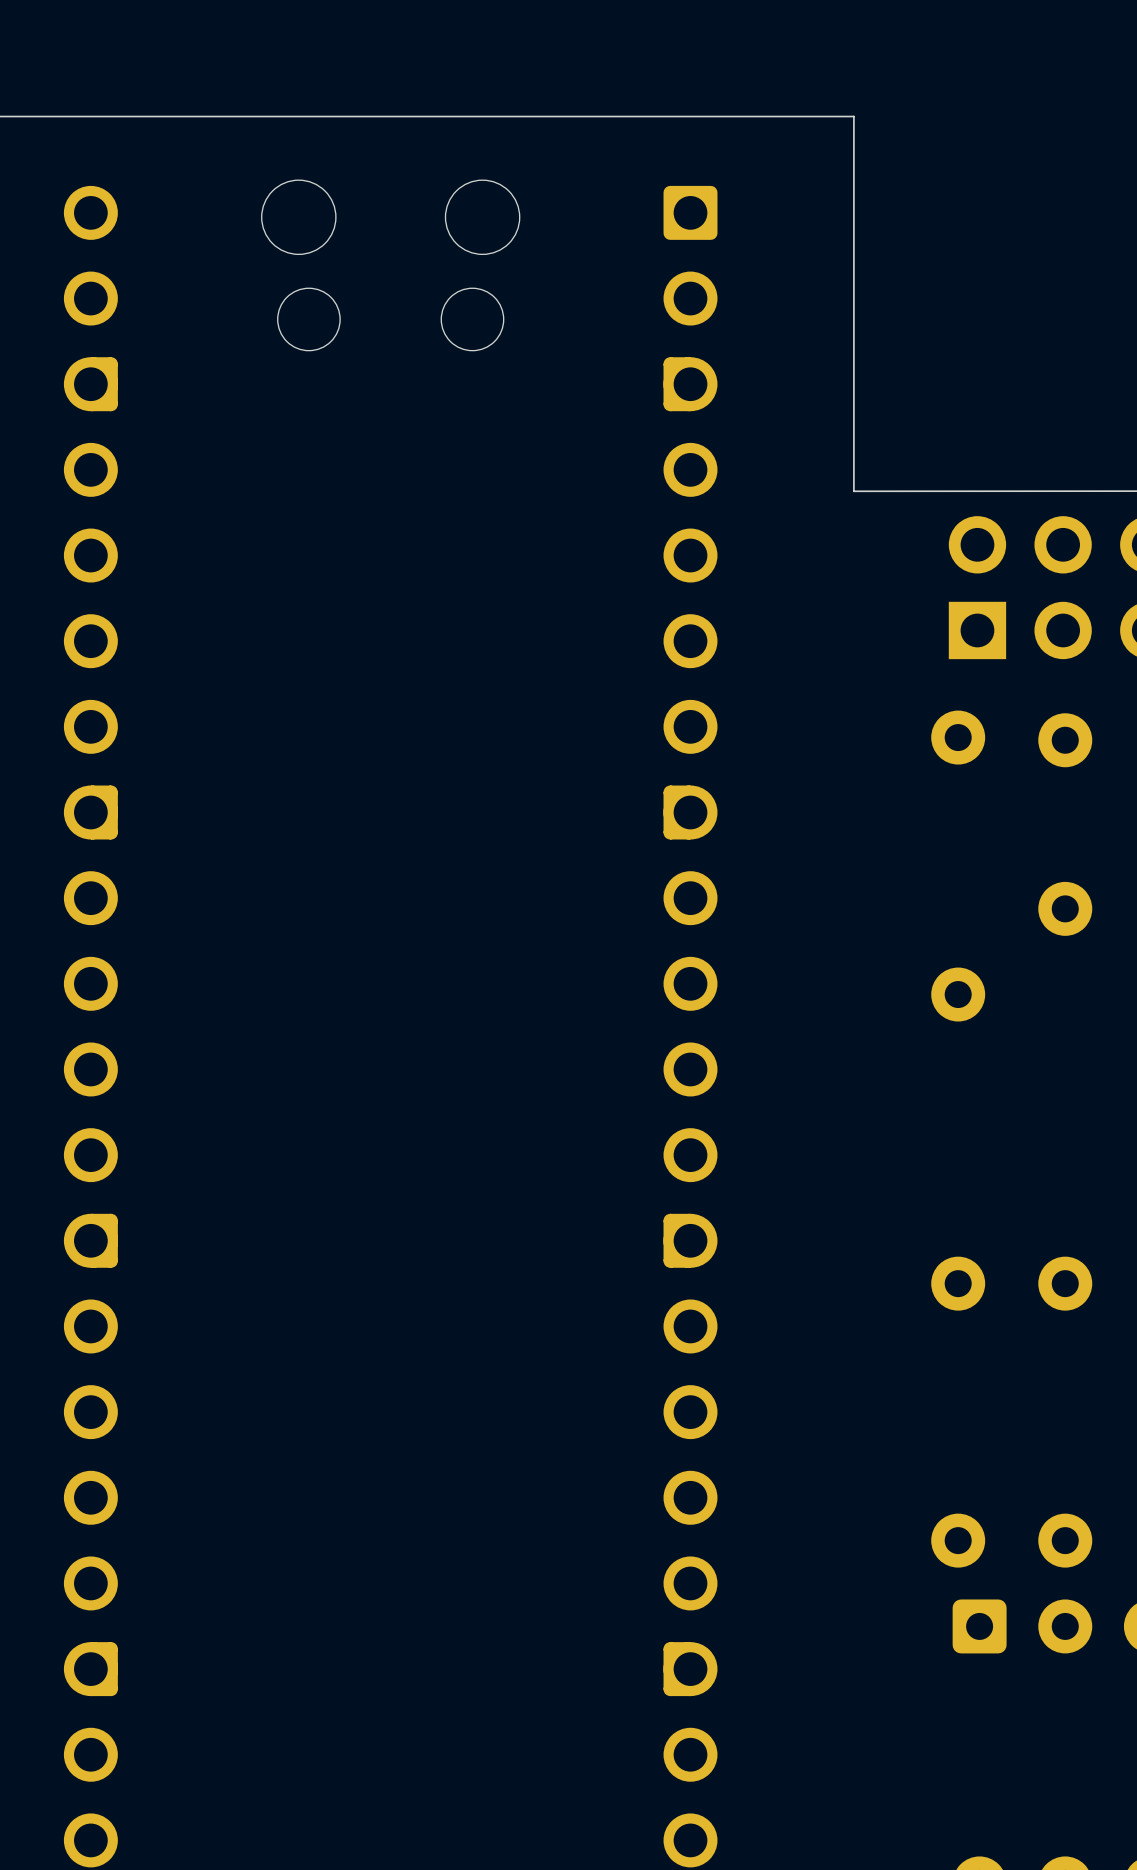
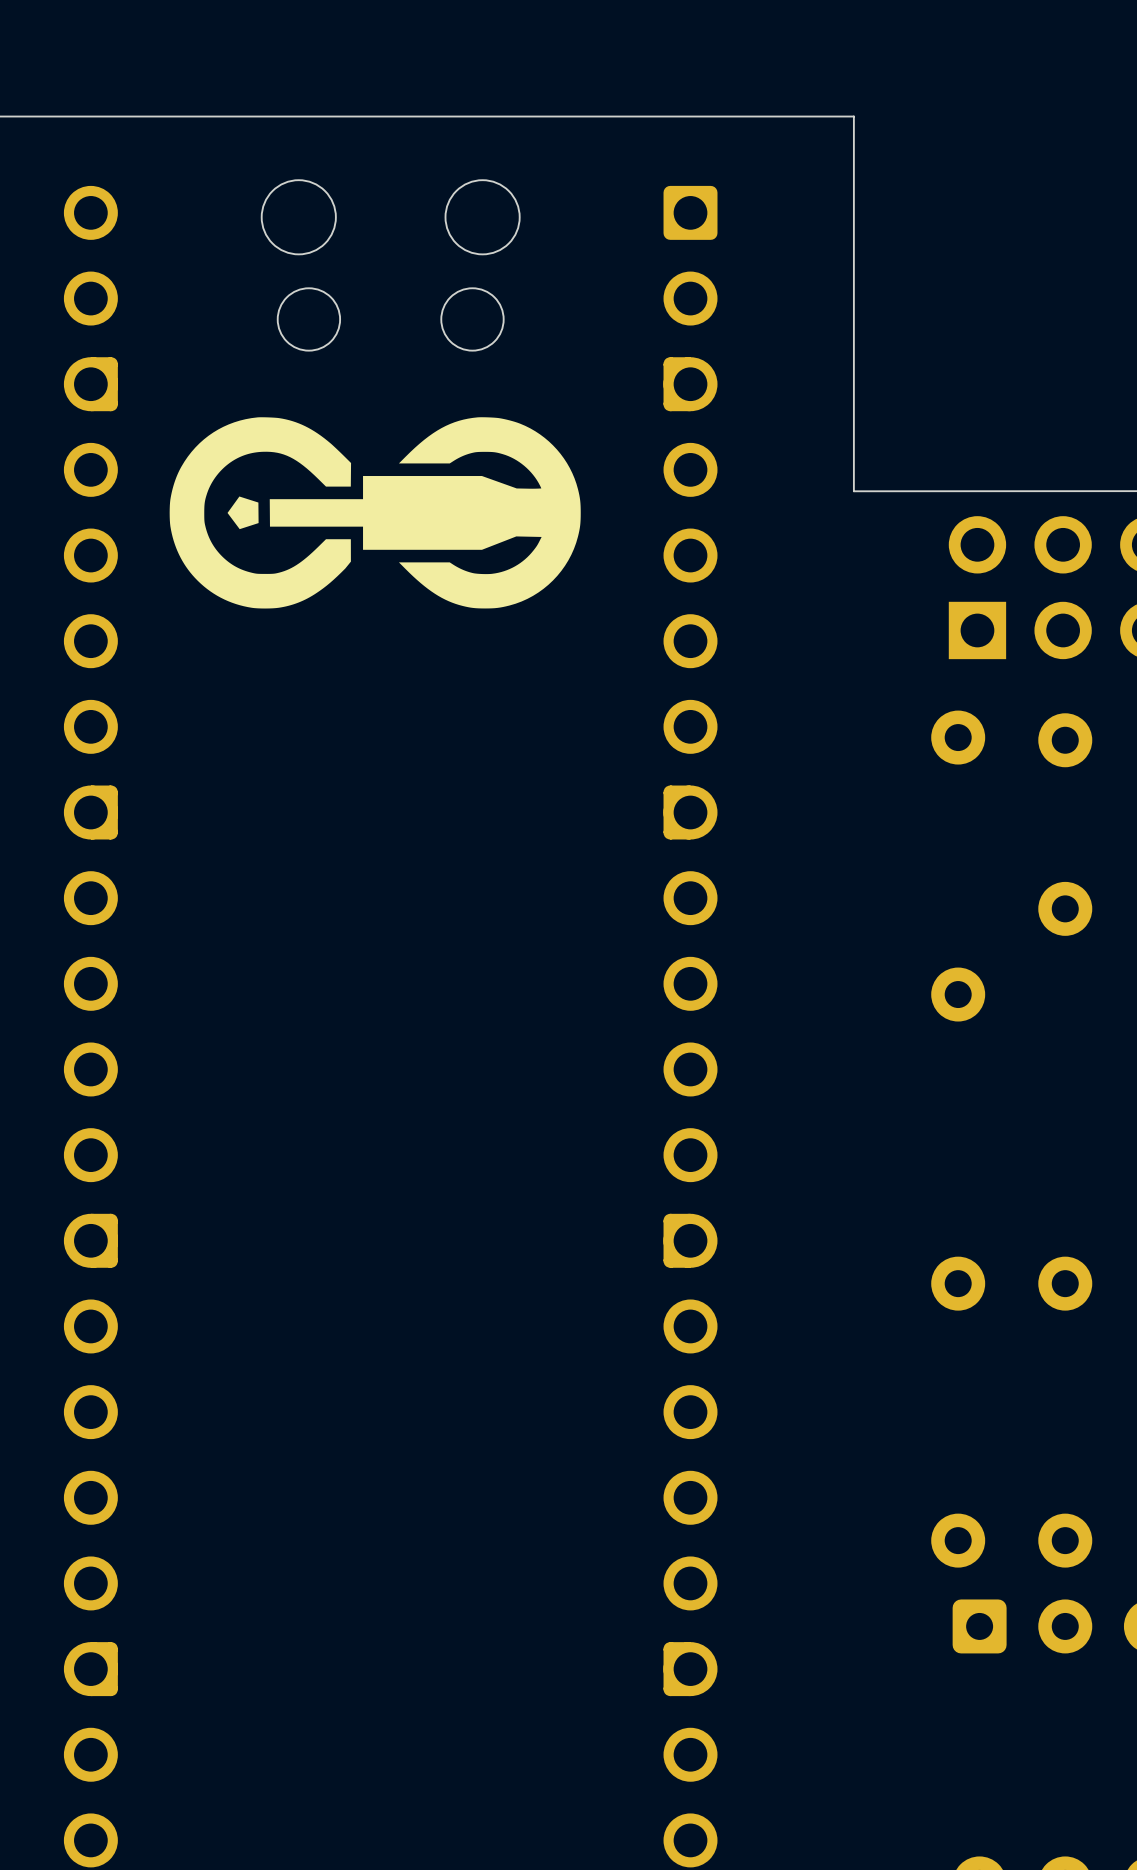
drawing: none -> [169, 417, 581, 609]

